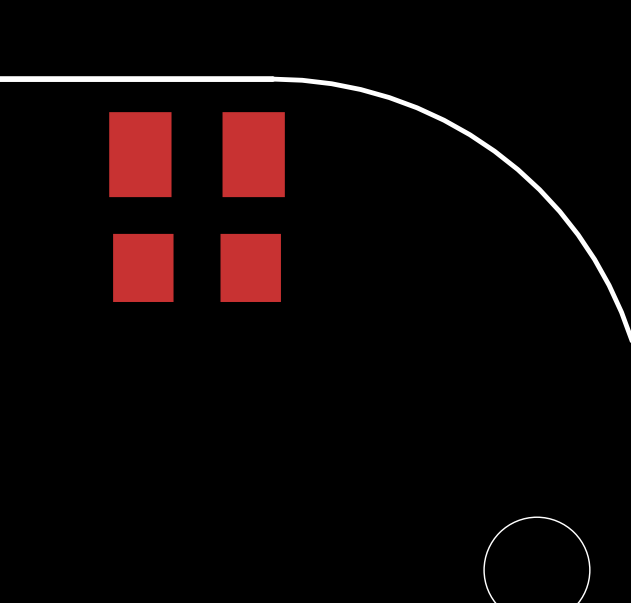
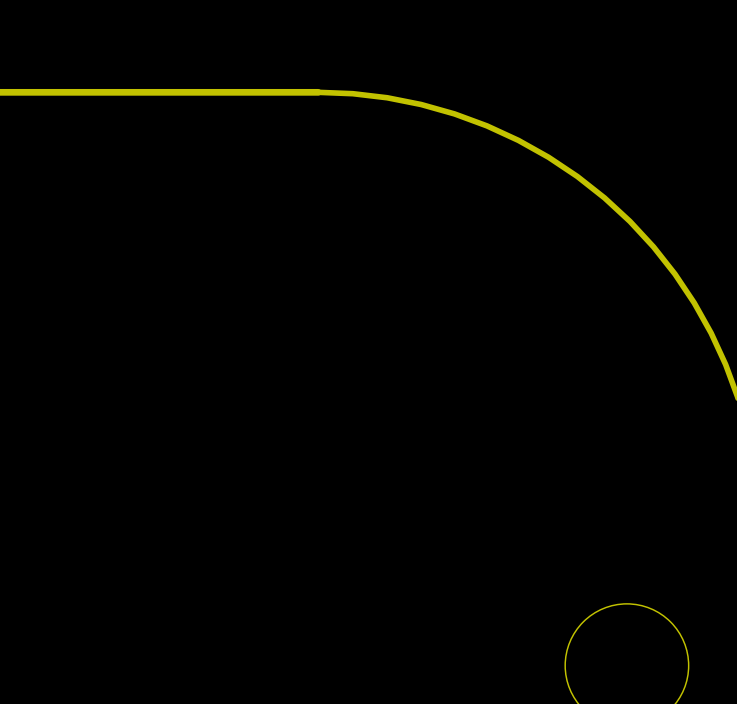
part: (197, 154) -> none
part: (197, 267) -> none

